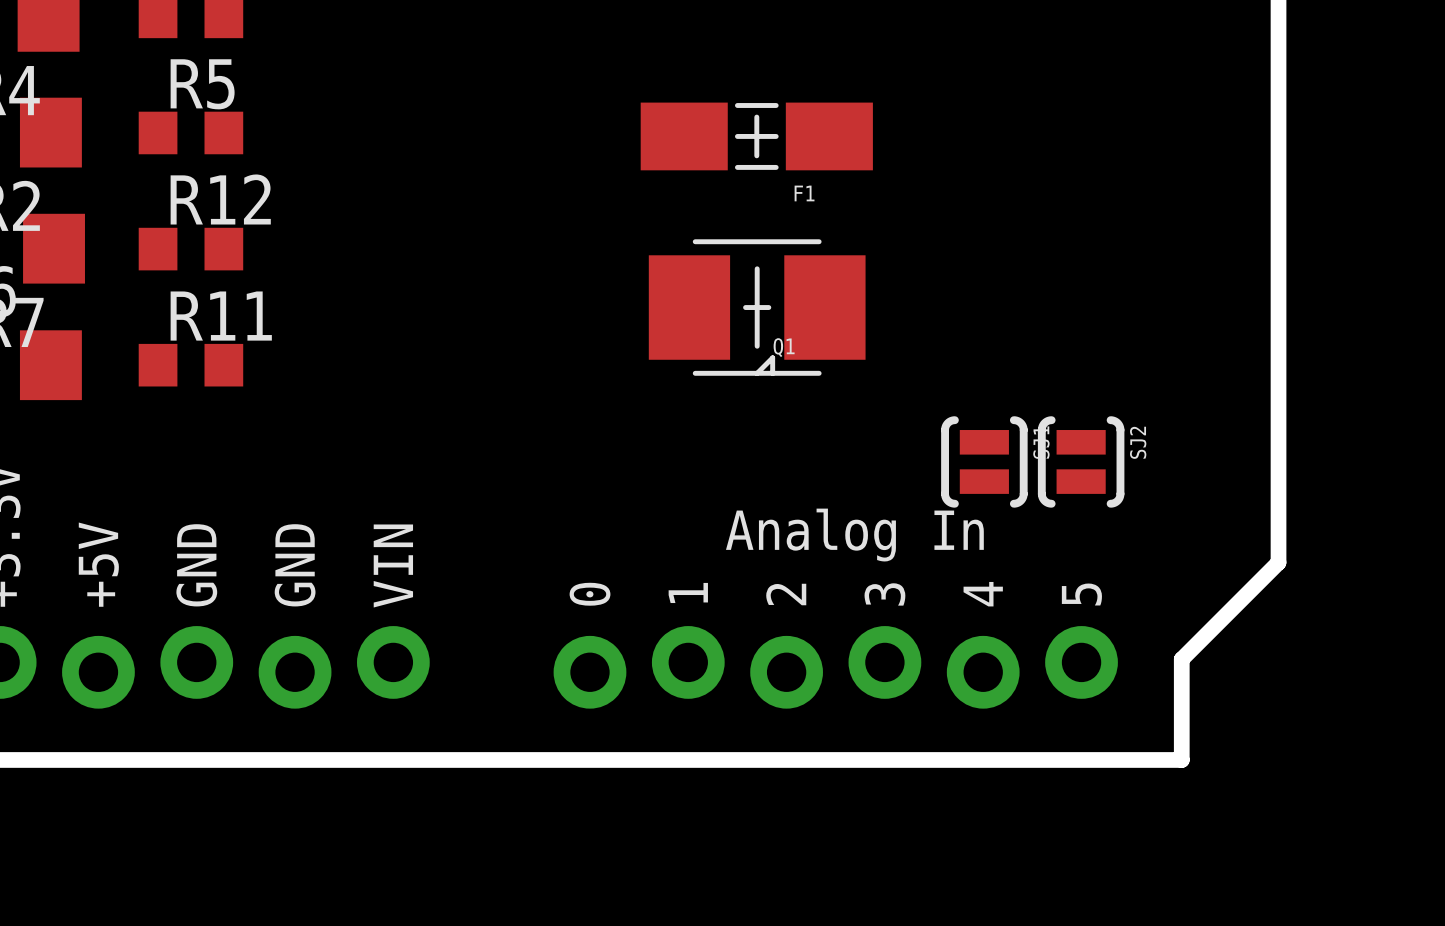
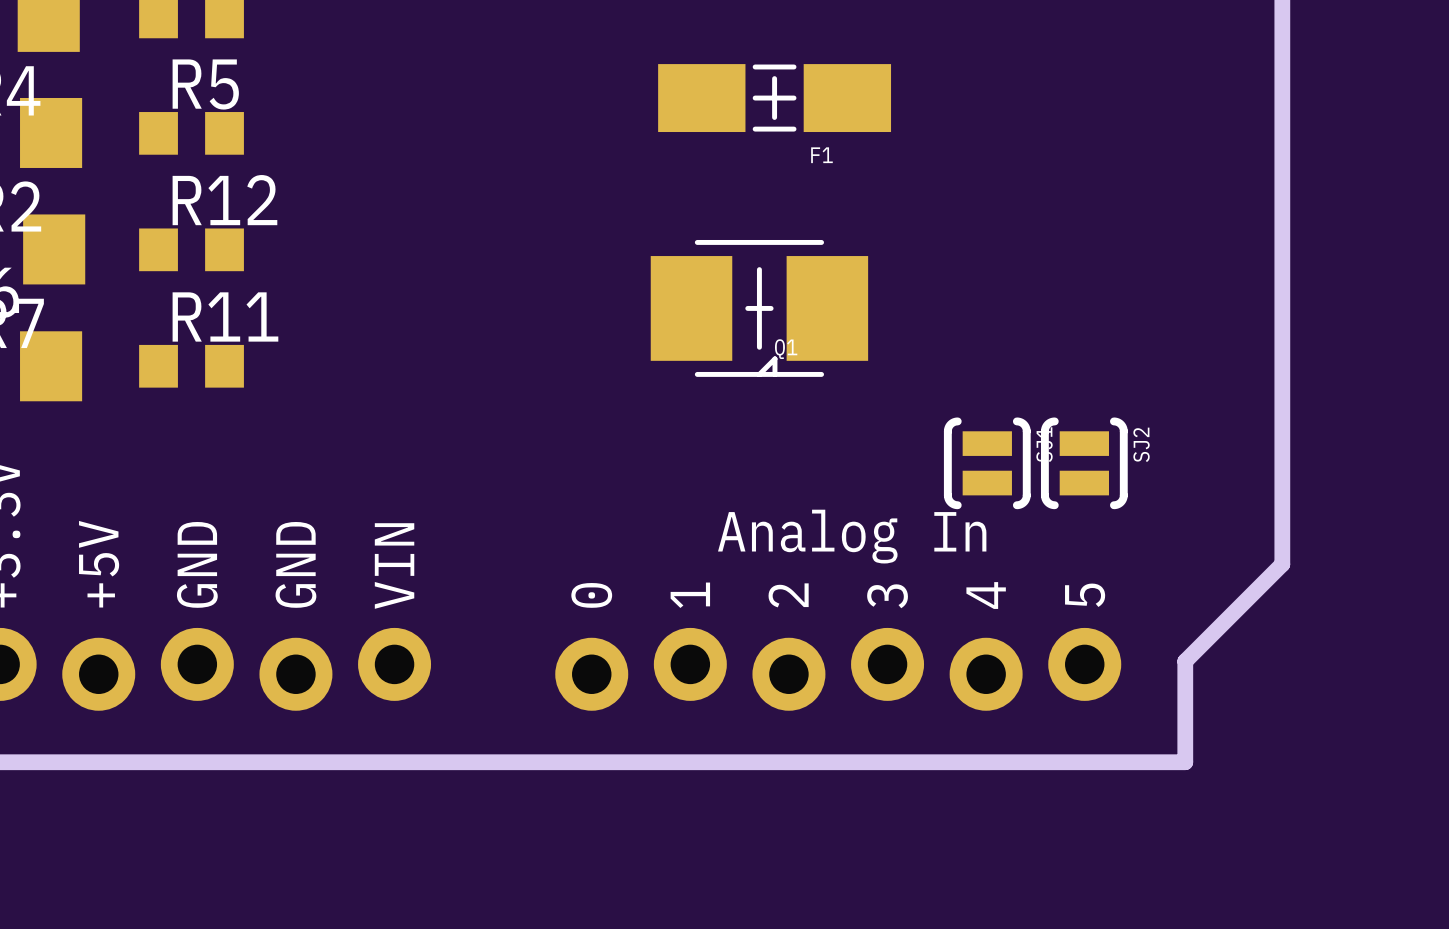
F1 position: (756, 136) -> (774, 98)

